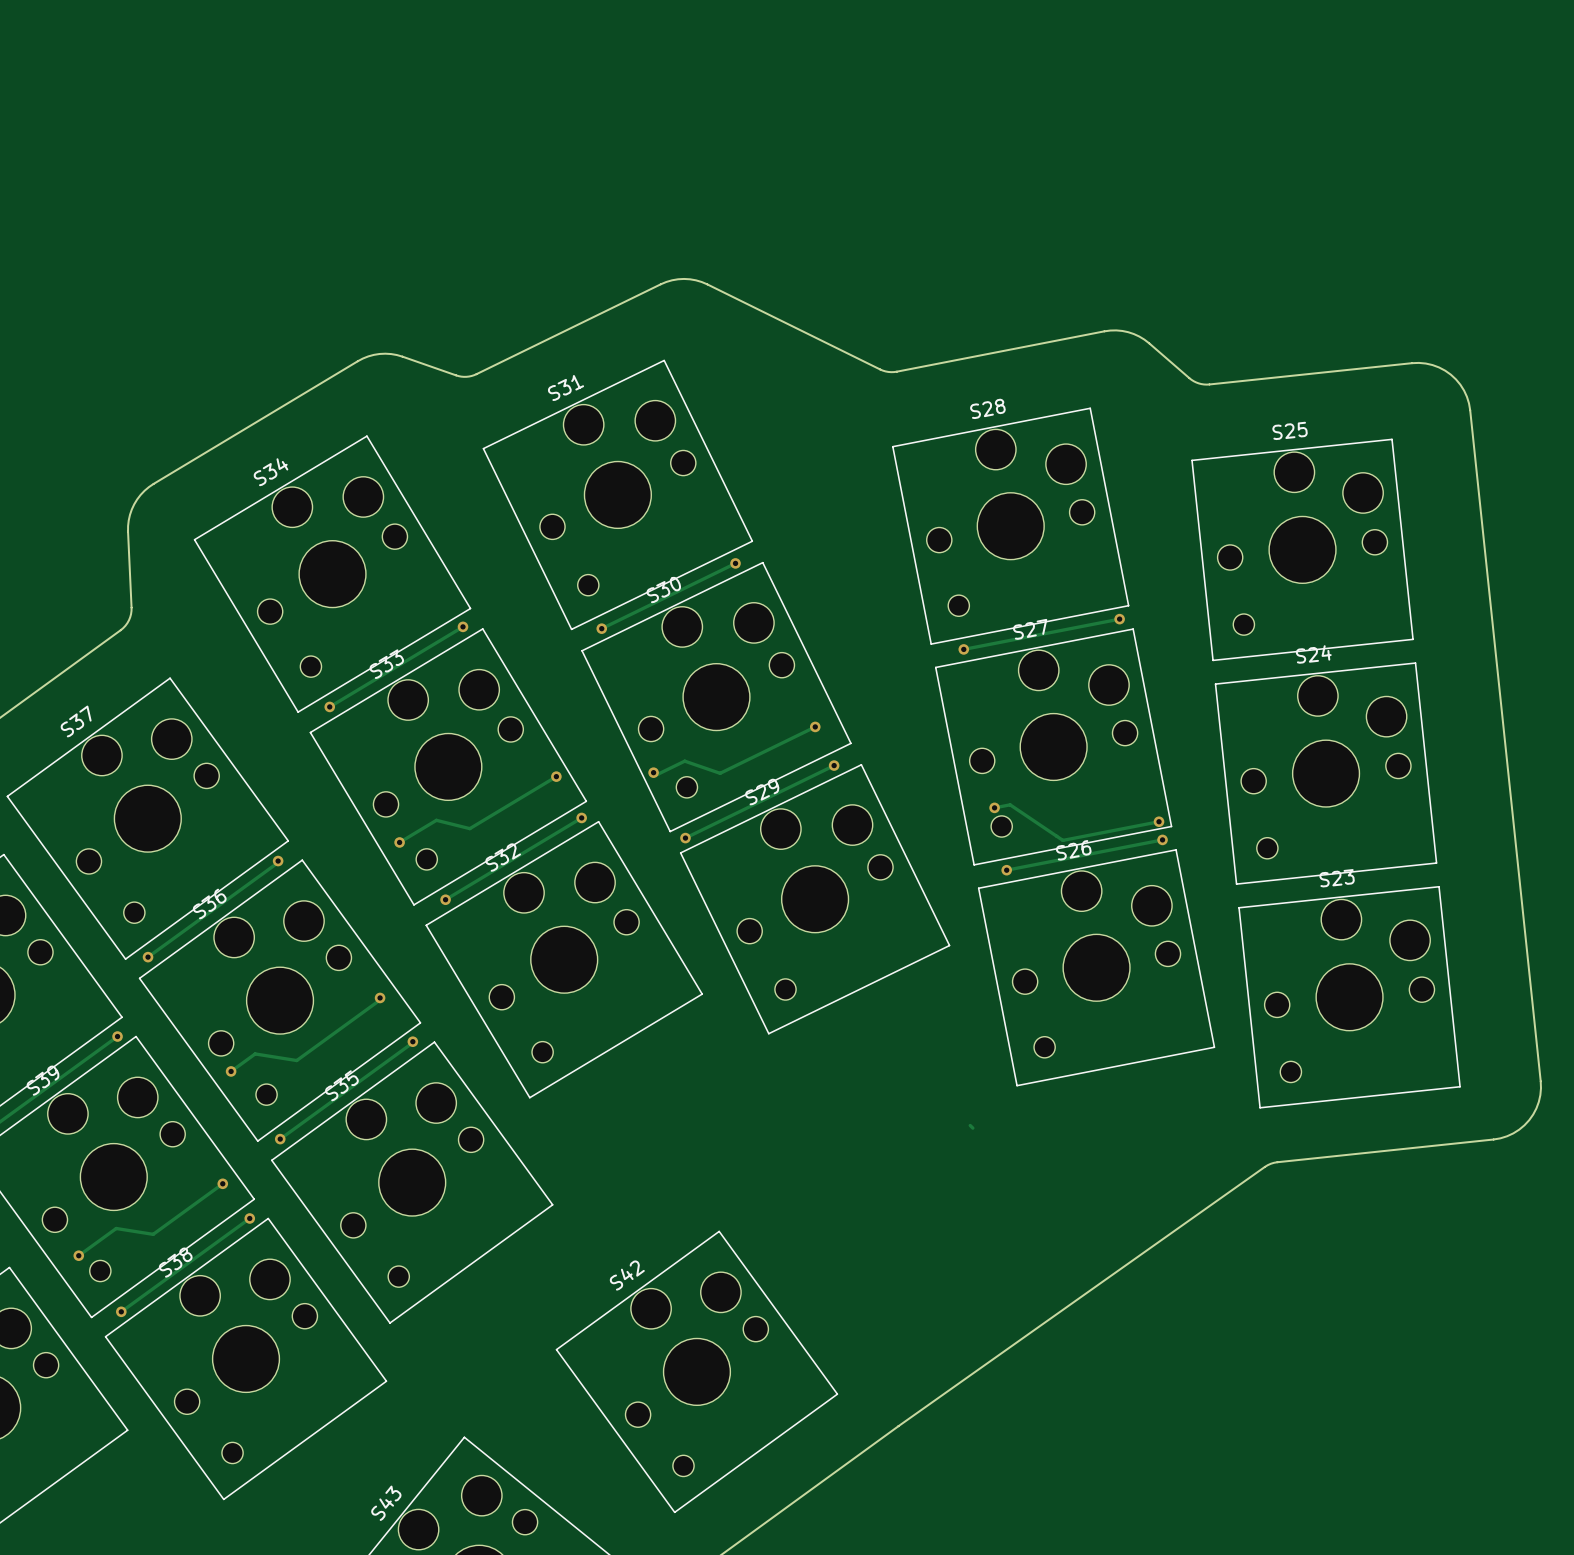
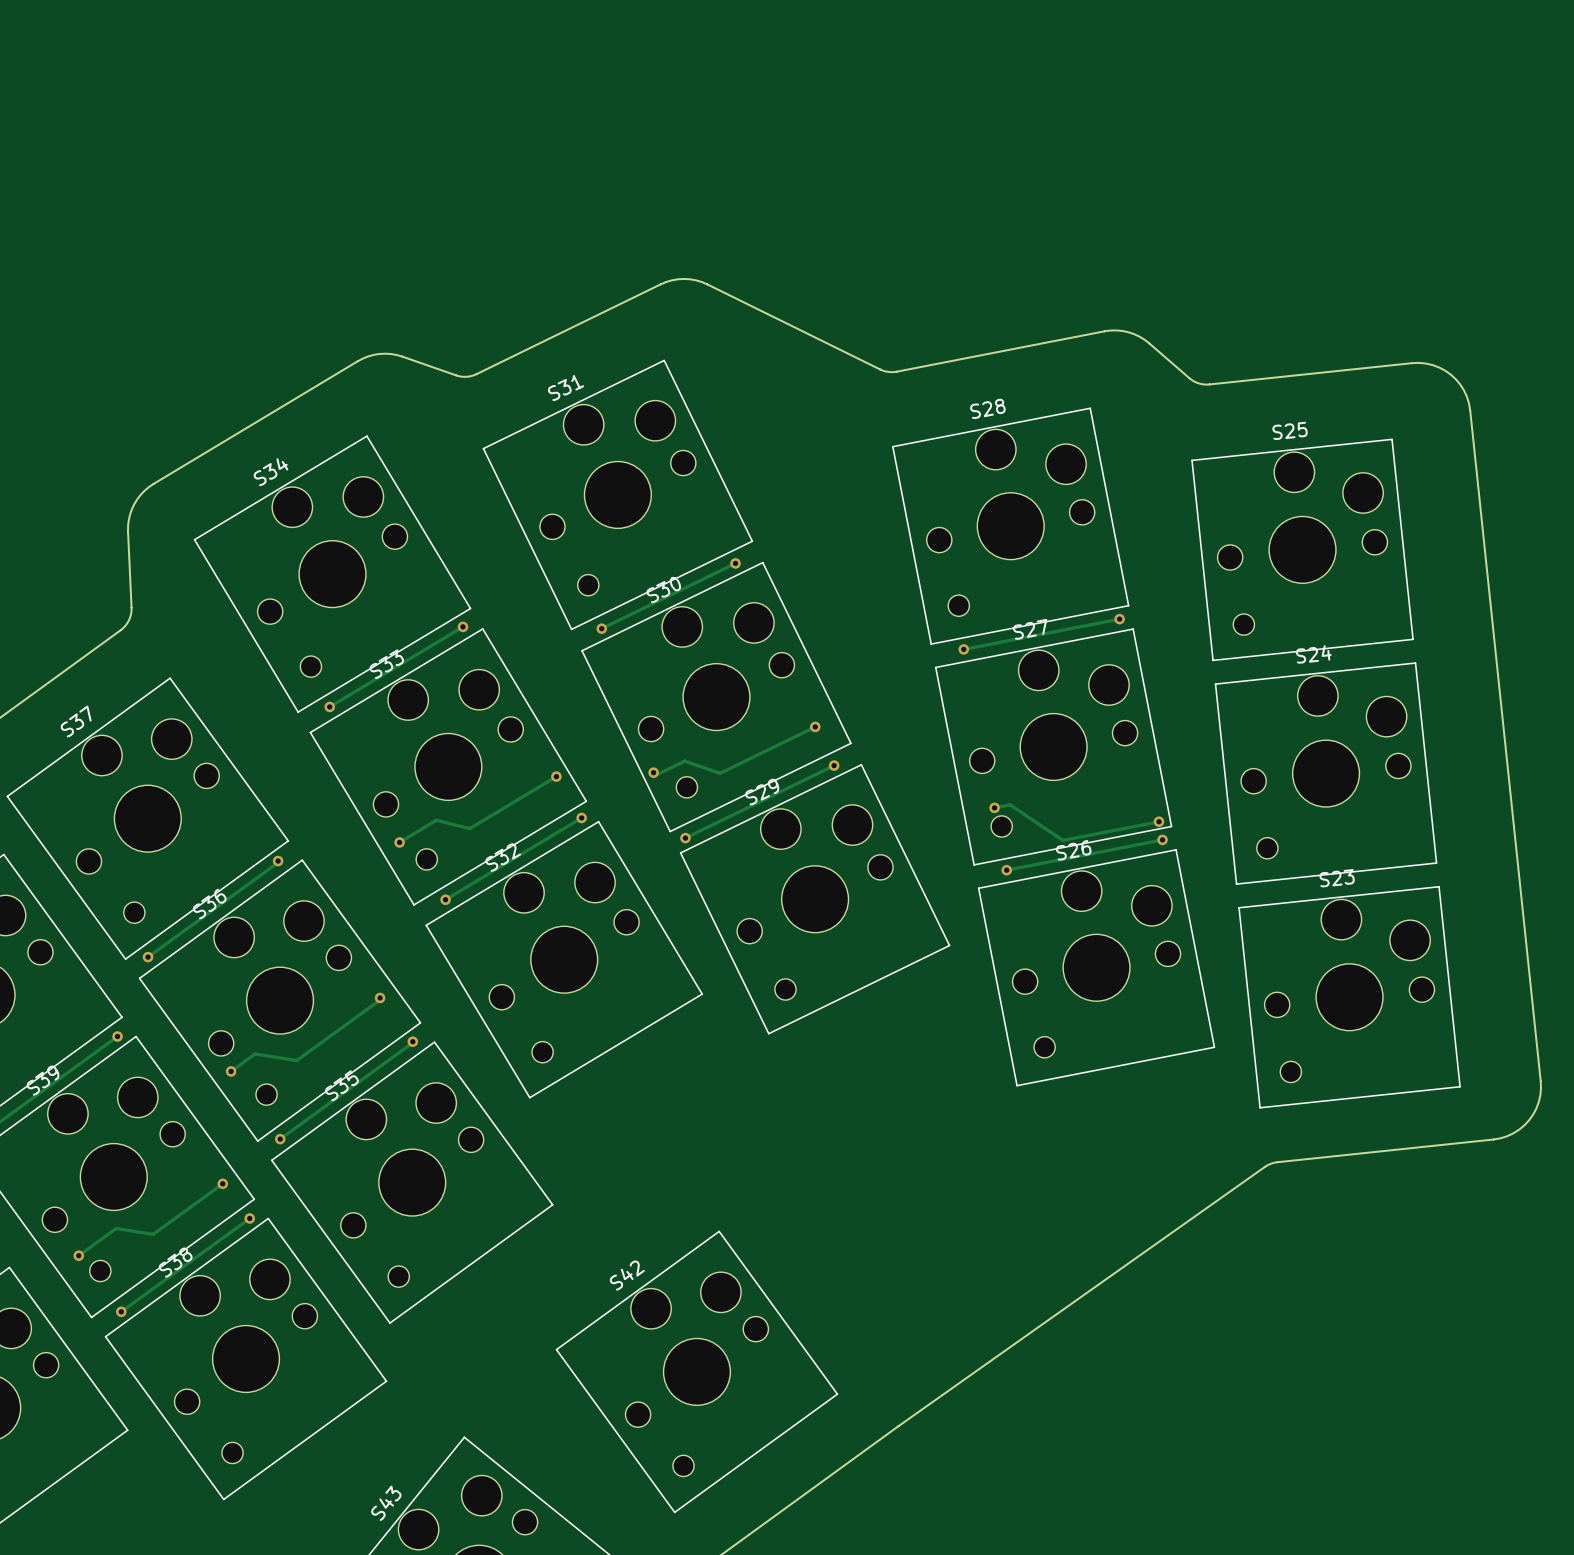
track: (970, 1125) (972, 1128) -> none

